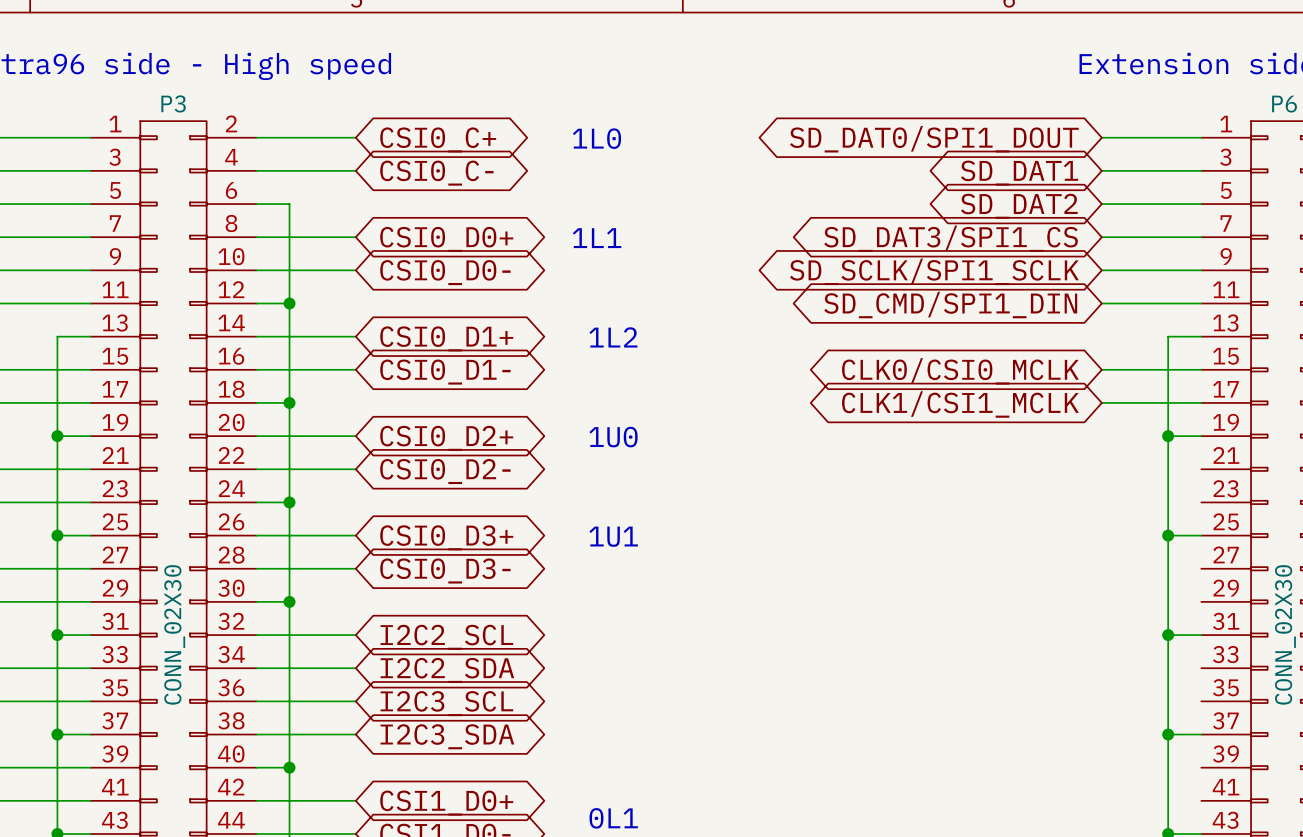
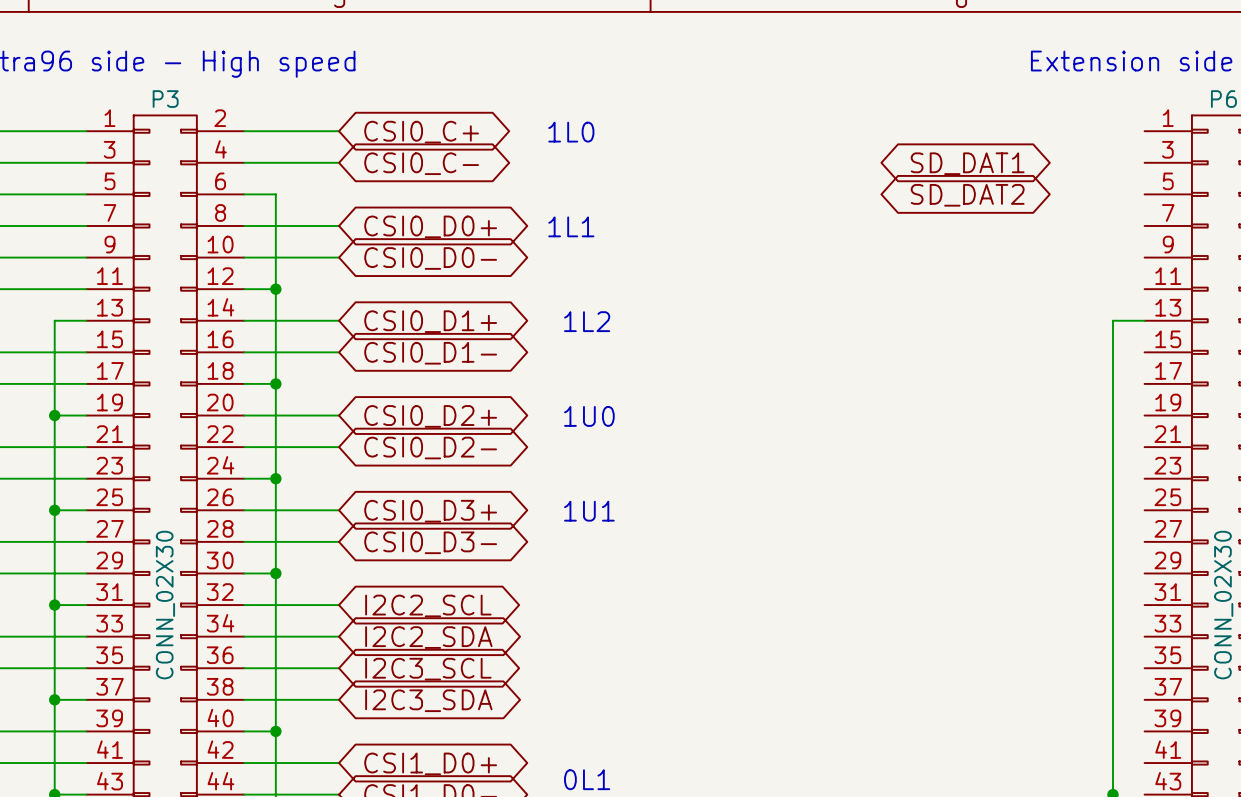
wire: (1101, 137) (1201, 137) -> none
global label: SD_DAT0/SPI1_DOUT (934, 139) -> none
wire: (1101, 170) (1201, 170) -> none
wire: (1101, 204) (1201, 204) -> none
wire: (1101, 237) (1201, 237) -> none
global label: SD_DAT3/SPI1_CS (951, 238) -> none
wire: (1101, 270) (1201, 270) -> none
global label: SD_SCLK/SPI1_SCLK (934, 271) -> none
wire: (1101, 303) (1201, 303) -> none
global label: SD_CMD/SPI1_DIN (950, 305) -> none
wire: (1101, 369) (1201, 369) -> none
global label: CLK0/CSI0_MCLK (960, 371) -> none
wire: (1101, 402) (1201, 402) -> none
global label: CLK1/CSI1_MCLK (960, 404) -> none
wire: (1168, 436) (1201, 436) -> none
junction: (1168, 436) -> none
wire: (1168, 535) (1201, 535) -> none
junction: (1168, 535) -> none
wire: (1168, 635) (1201, 635) -> none
junction: (1168, 635) -> none
wire: (1168, 734) (1201, 734) -> none
junction: (1168, 734) -> none
wire: (1168, 834) (1201, 834) -> none

